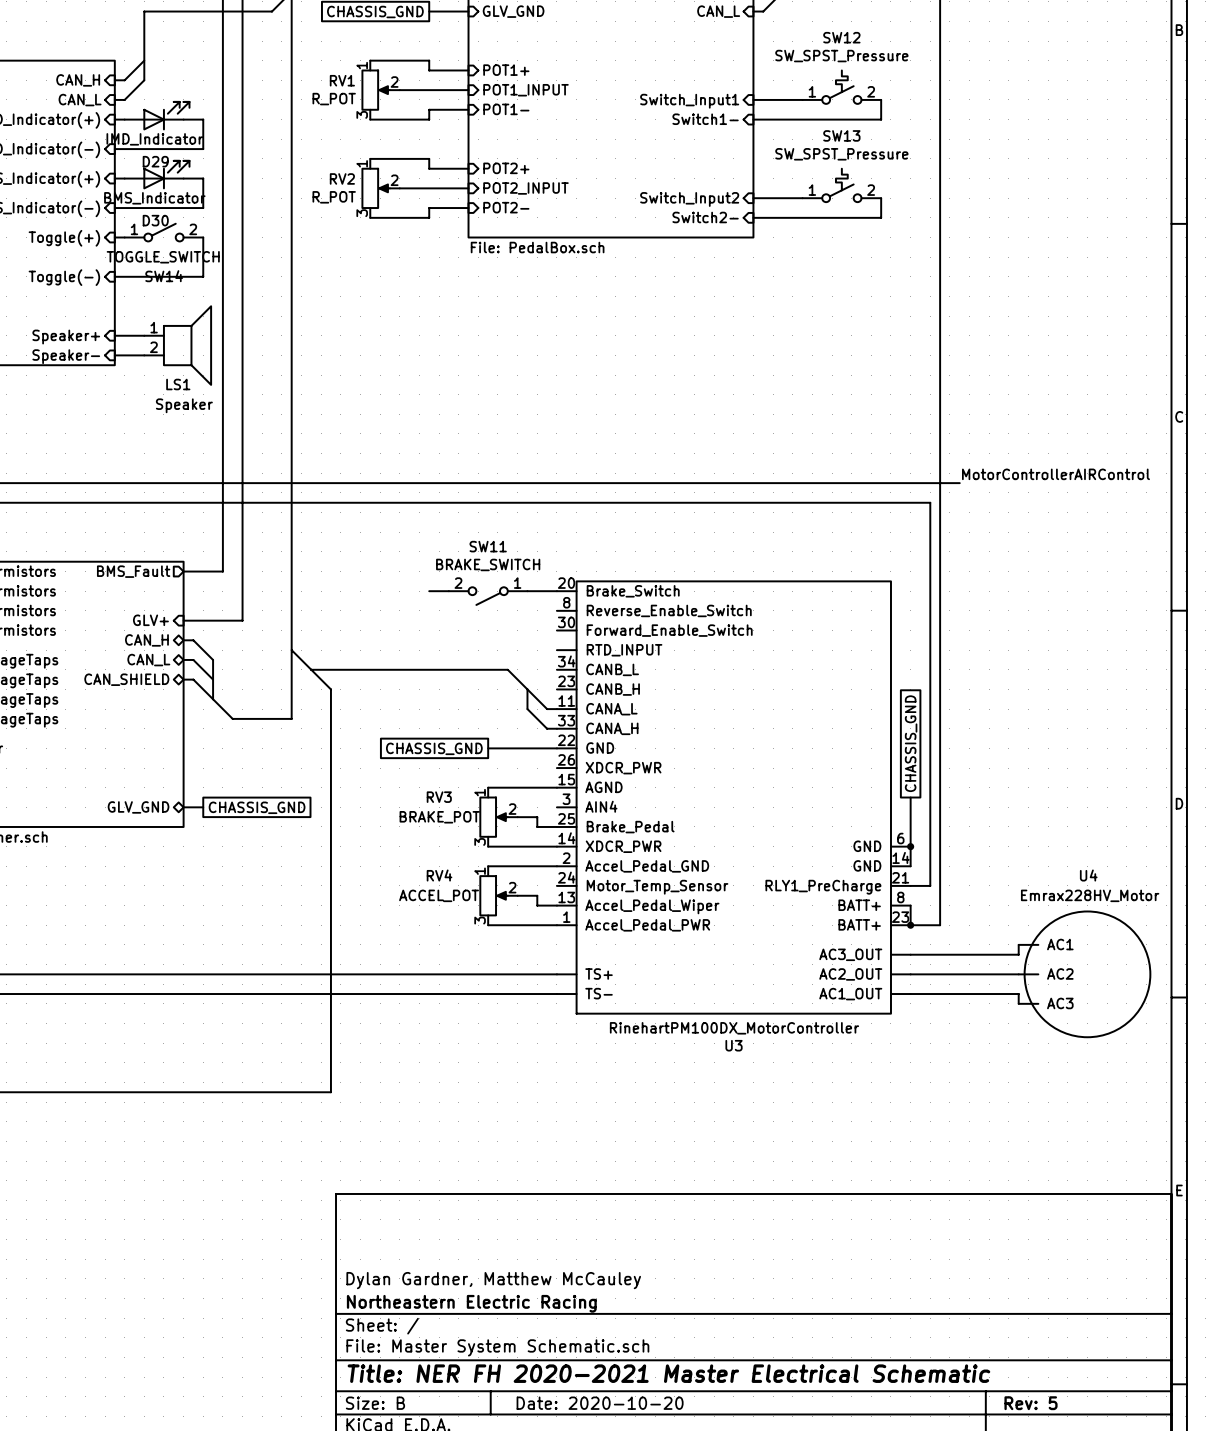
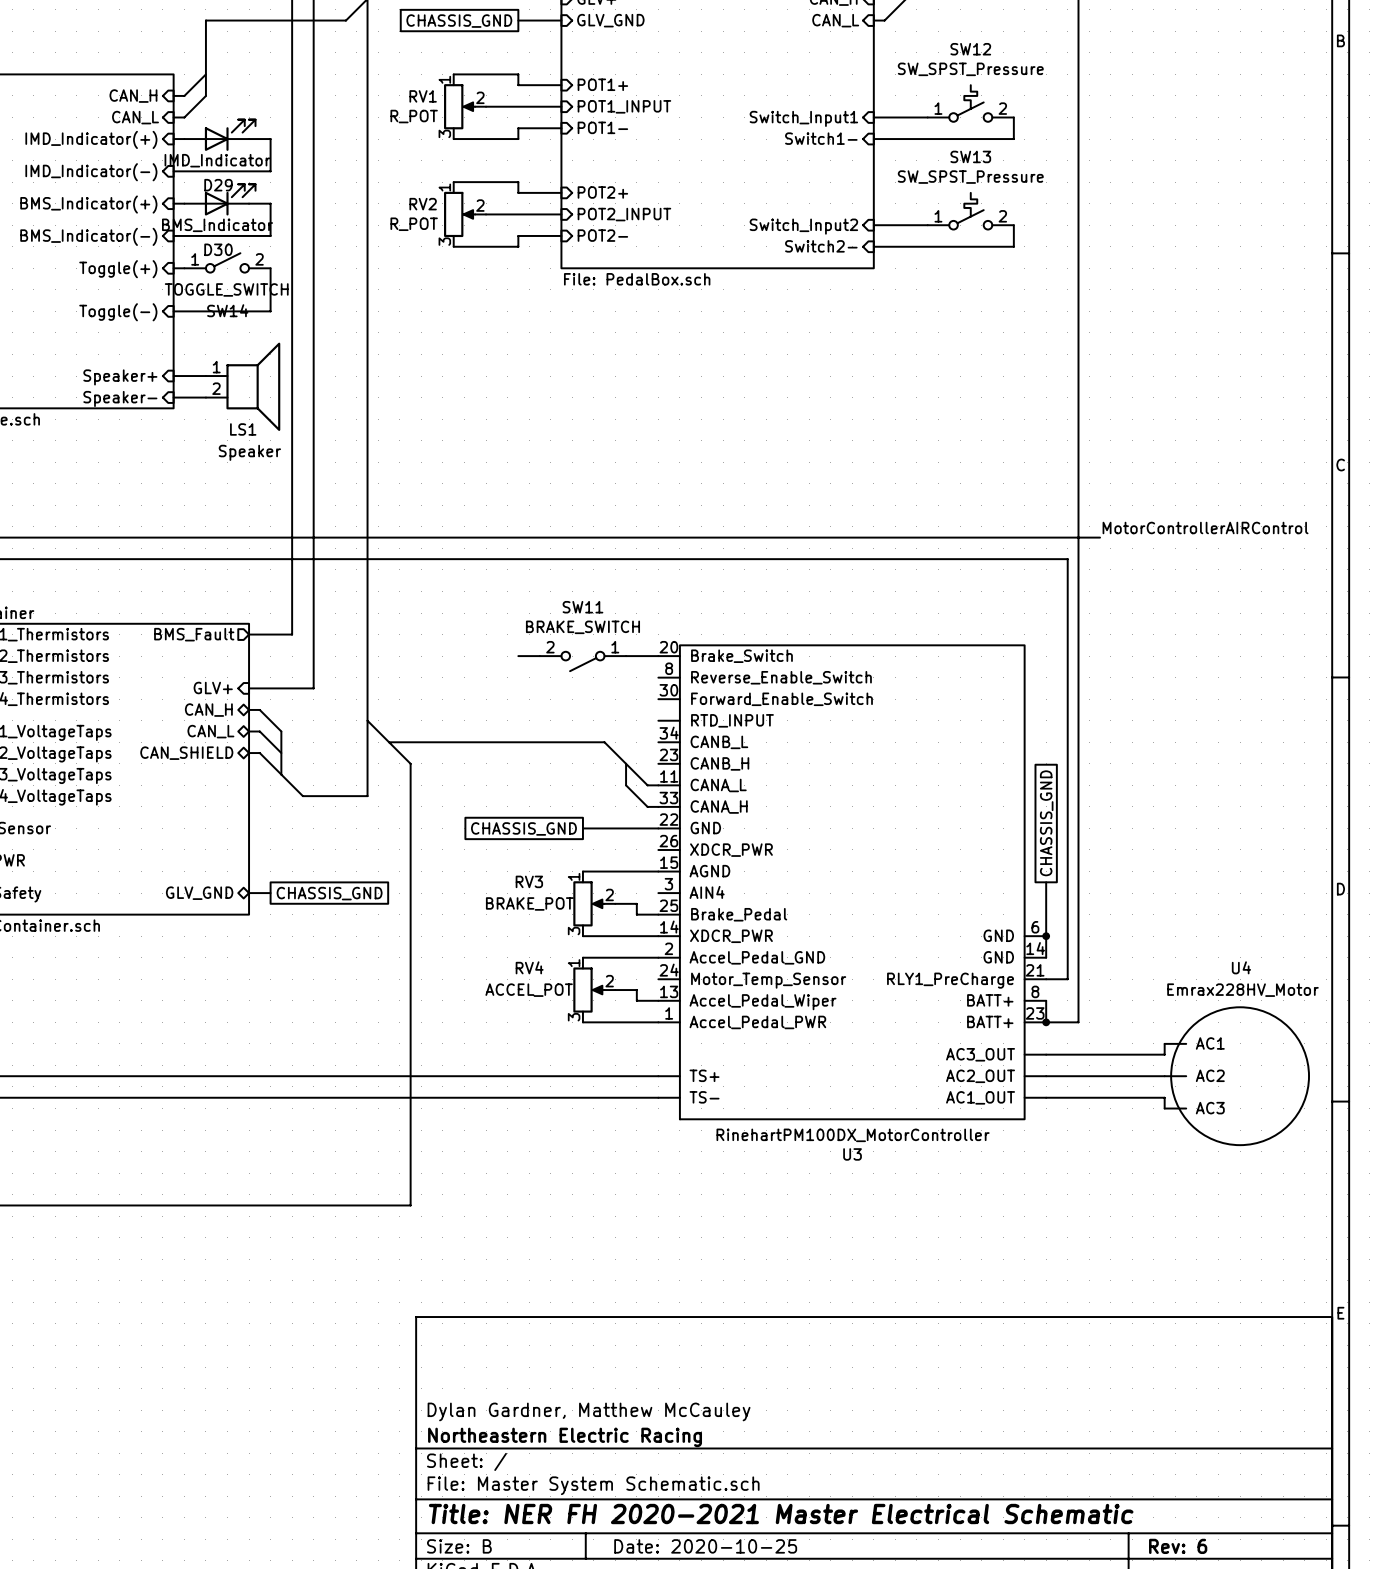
title block: Date: 2020-10-20 (600, 1403) -> Date: 2020-10-25 (705, 1546)
title block: Rev: 5 (1031, 1403) -> Rev: 6 (1178, 1546)

